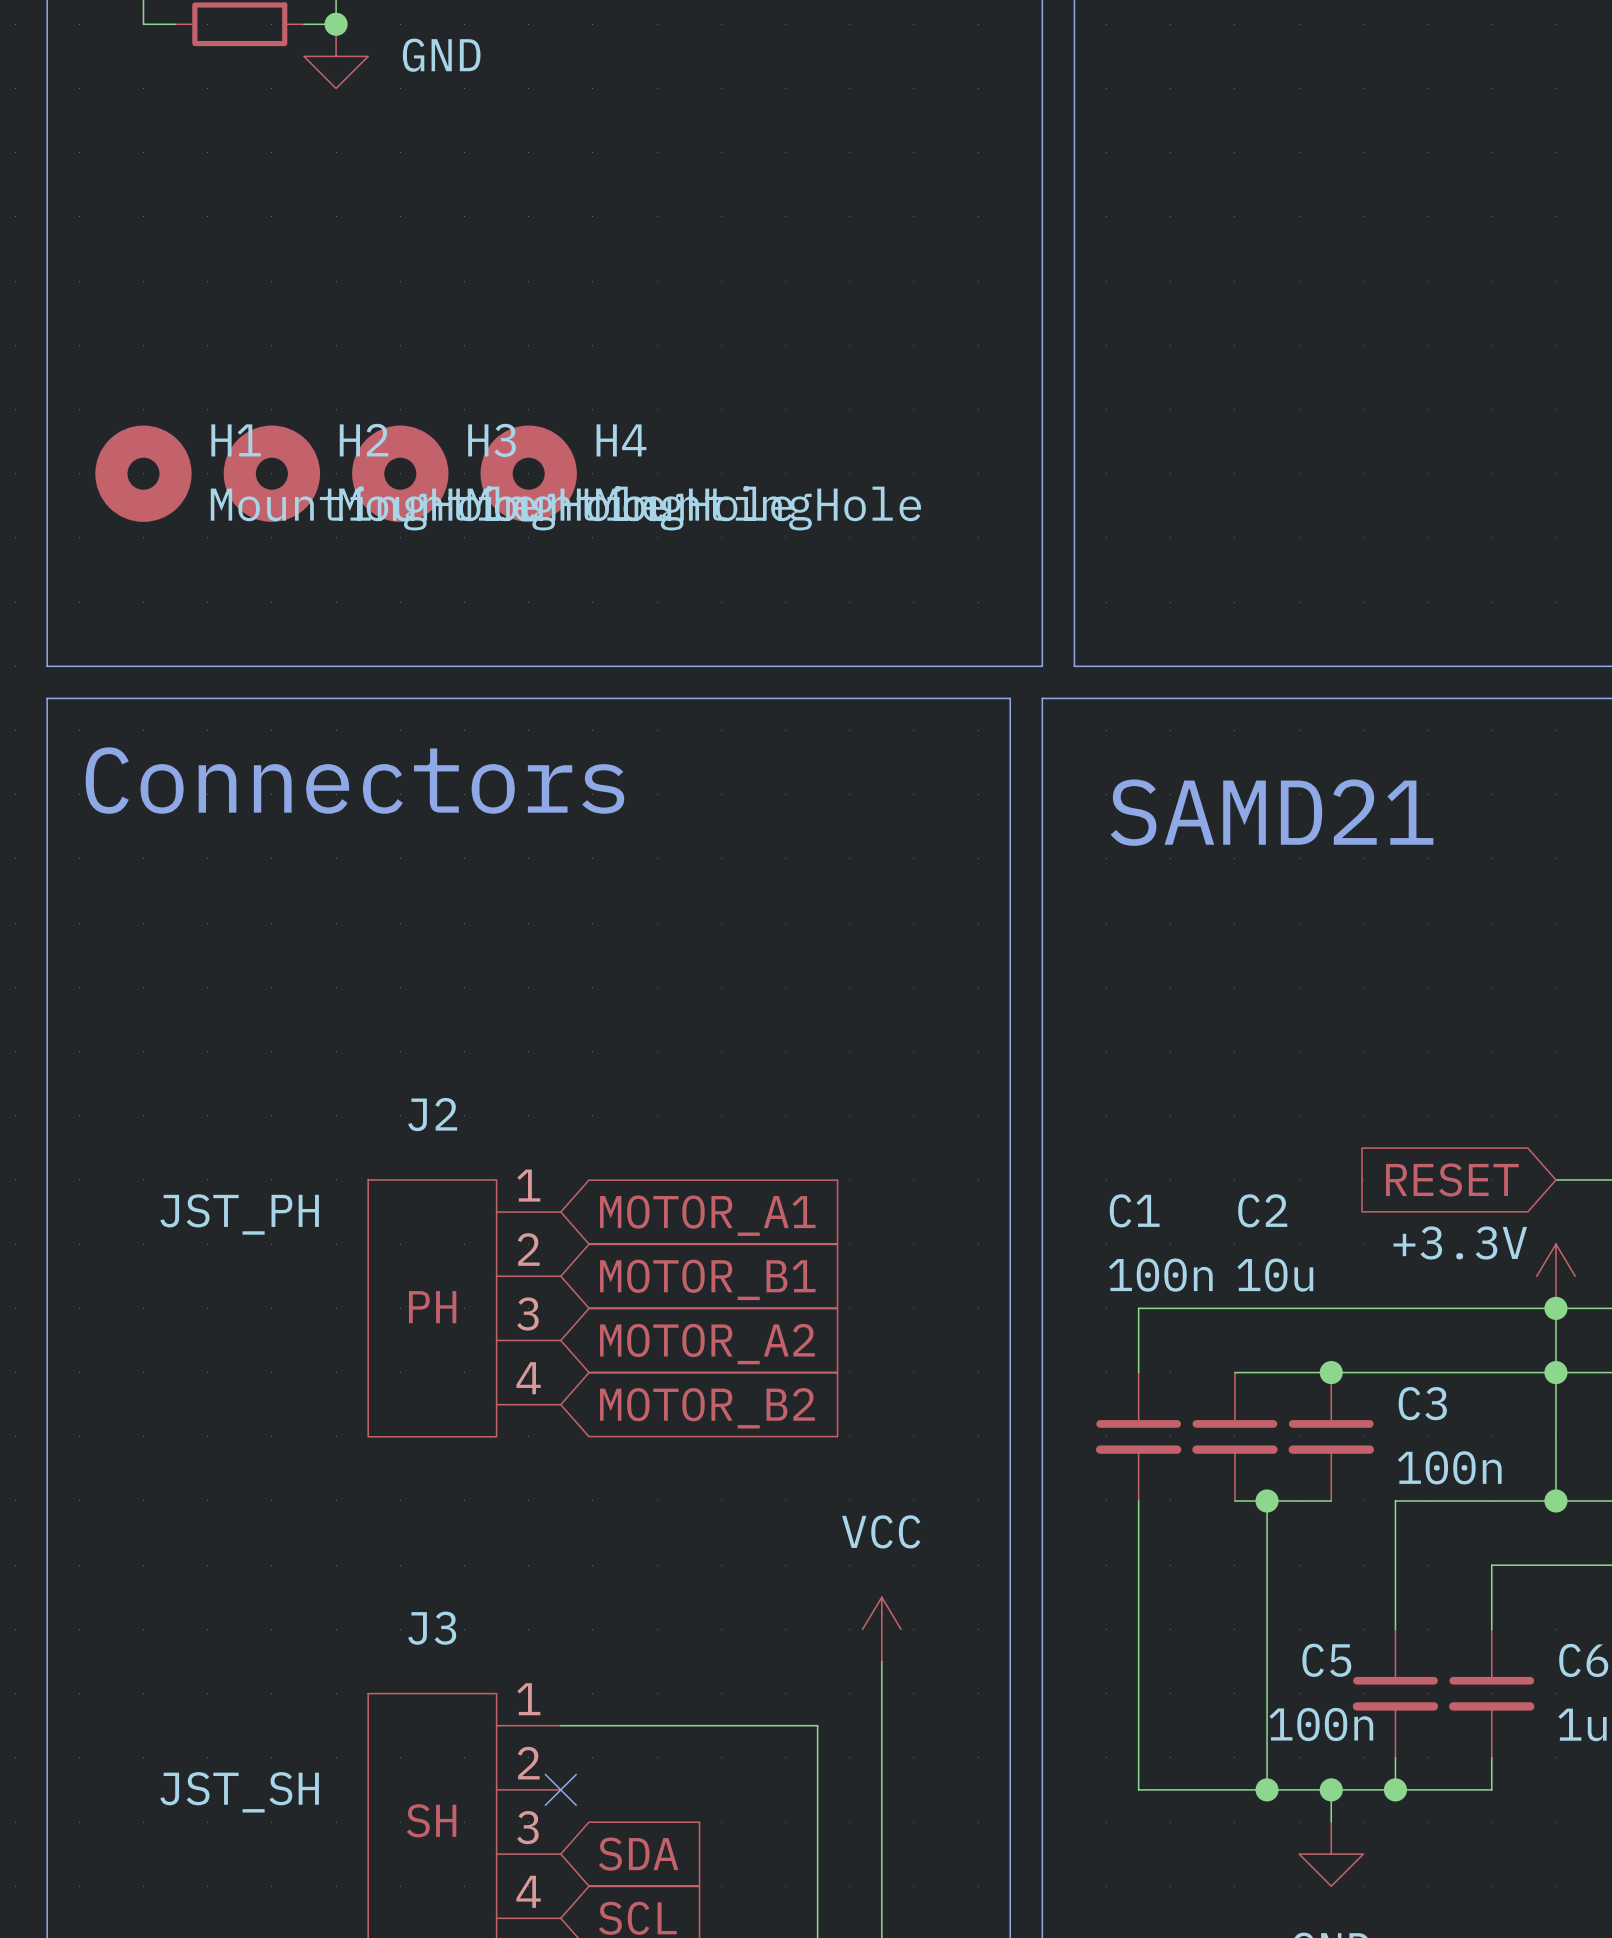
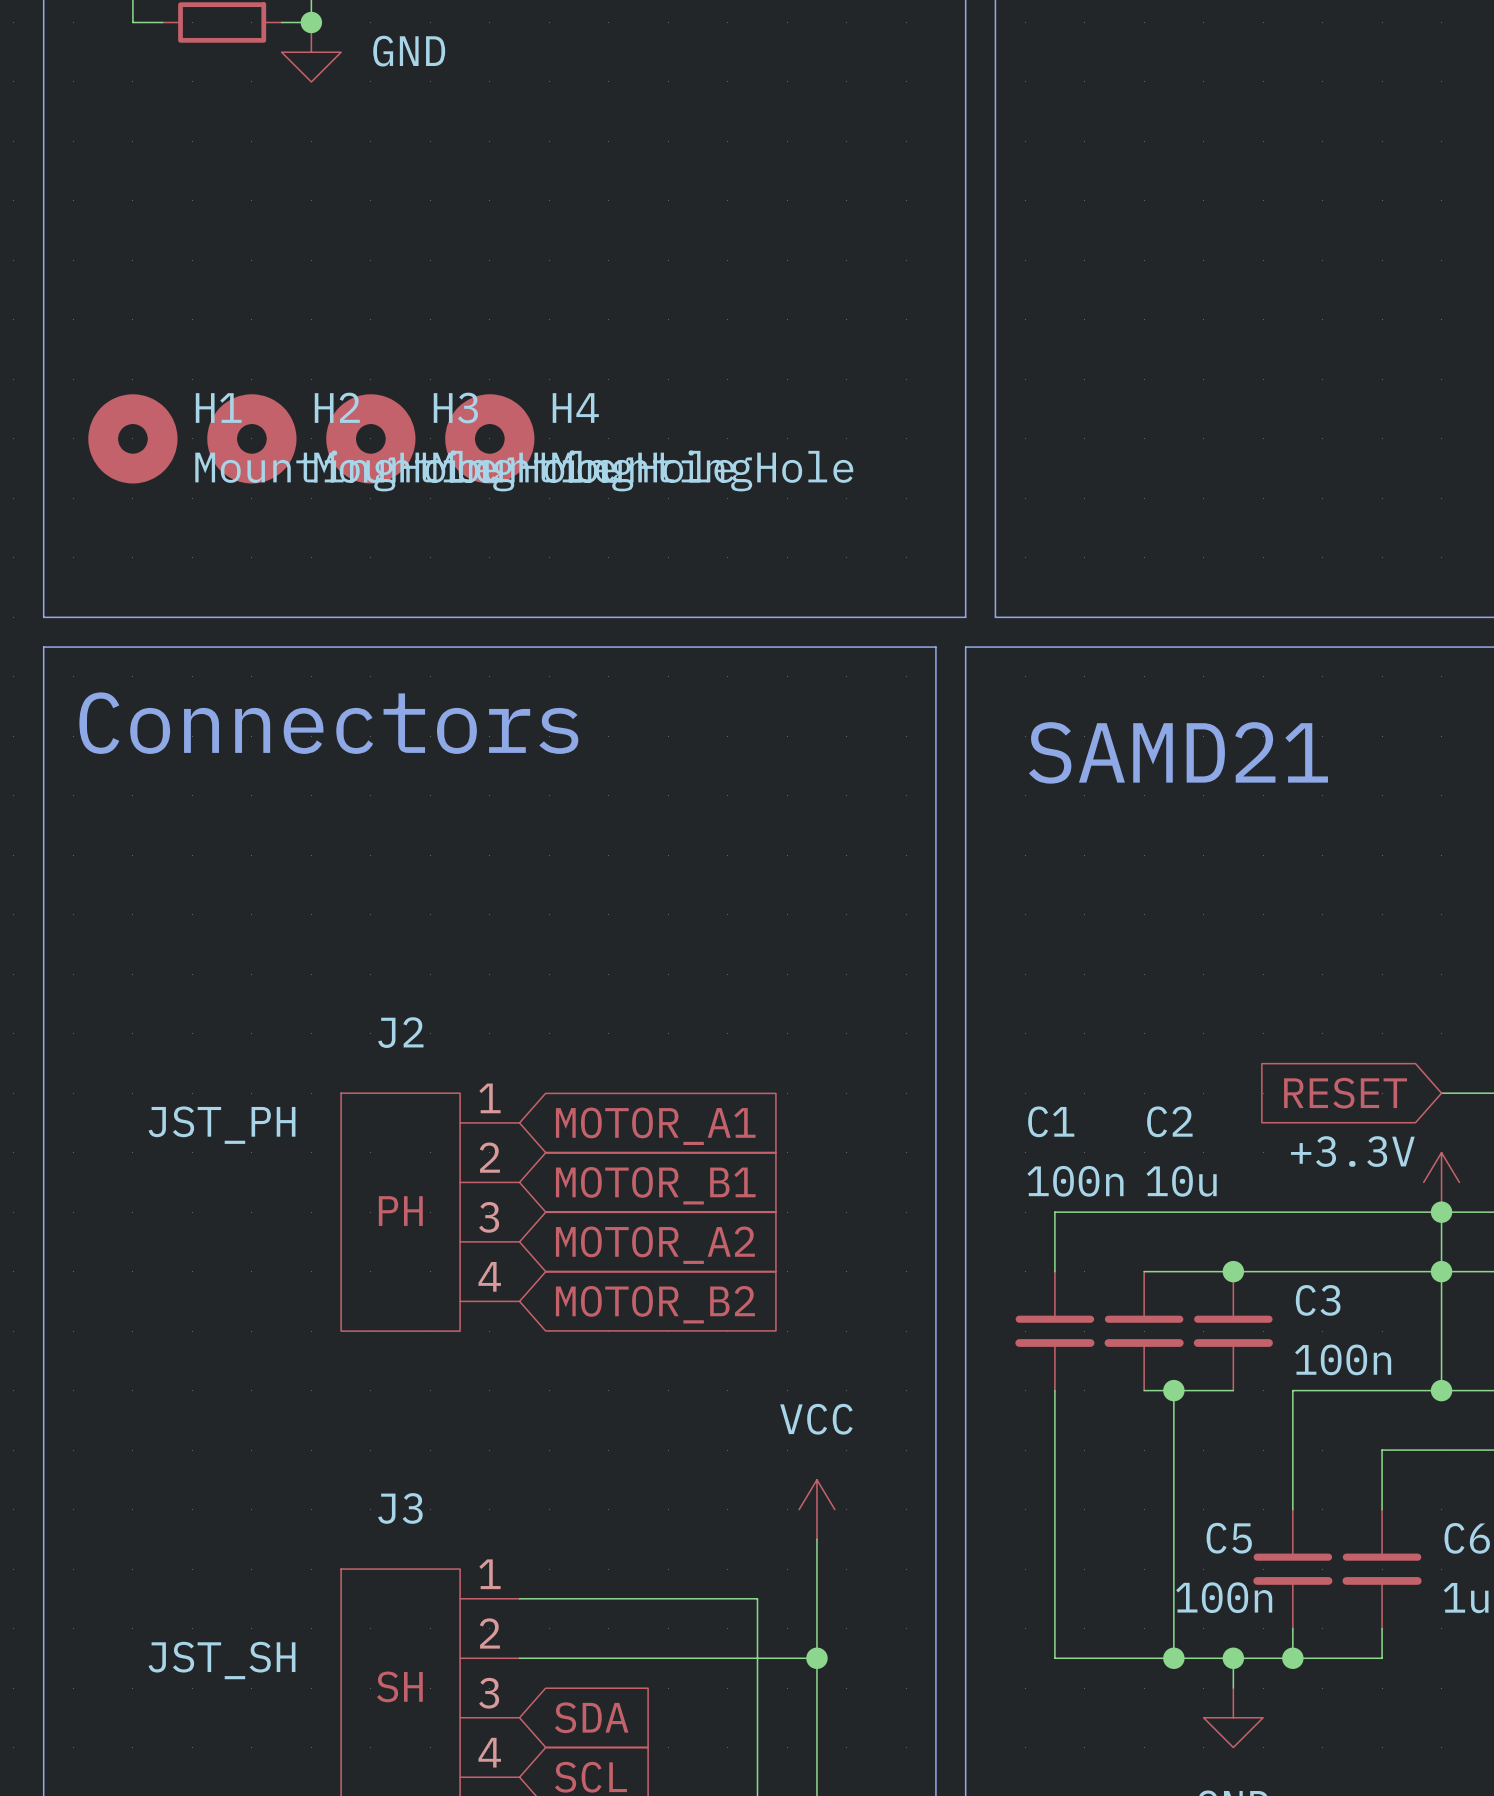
wire: none -> (519, 1658) (816, 1658)
no-connect mark: (560, 1789) -> none
junction: none -> (816, 1658)

